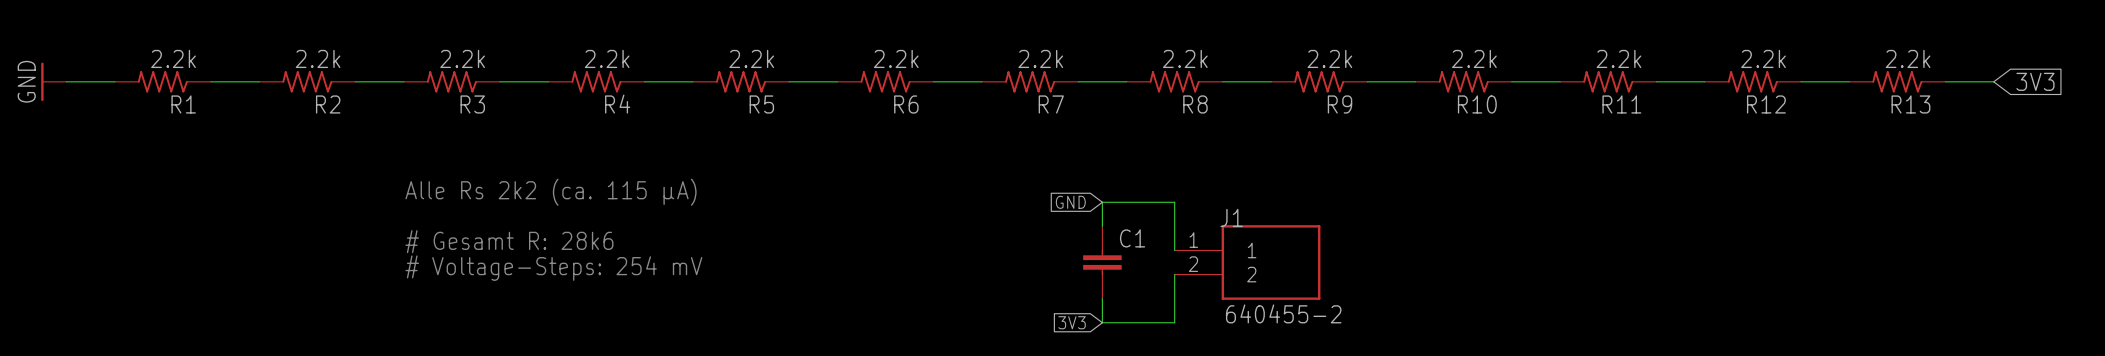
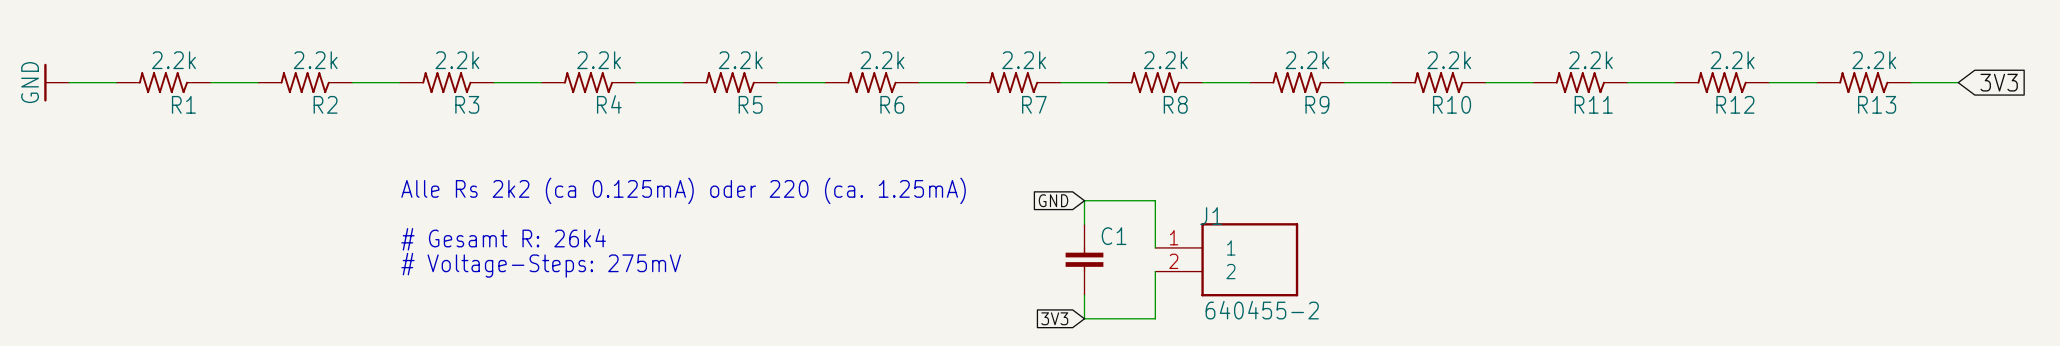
text: Alle Rs 2k2 (ca. 115 µA) (551, 192) -> Alle Rs 2k2 (ca 0.125mA) oder 220 (ca. 1.25mA) (683, 190)
text: # Gesamt R: 28k6 (509, 241) -> # Gesamt R: 26k4 (503, 239)
text: # Voltage-Steps: 254 mV (553, 268) -> # Voltage-Steps: 275mV (541, 265)

